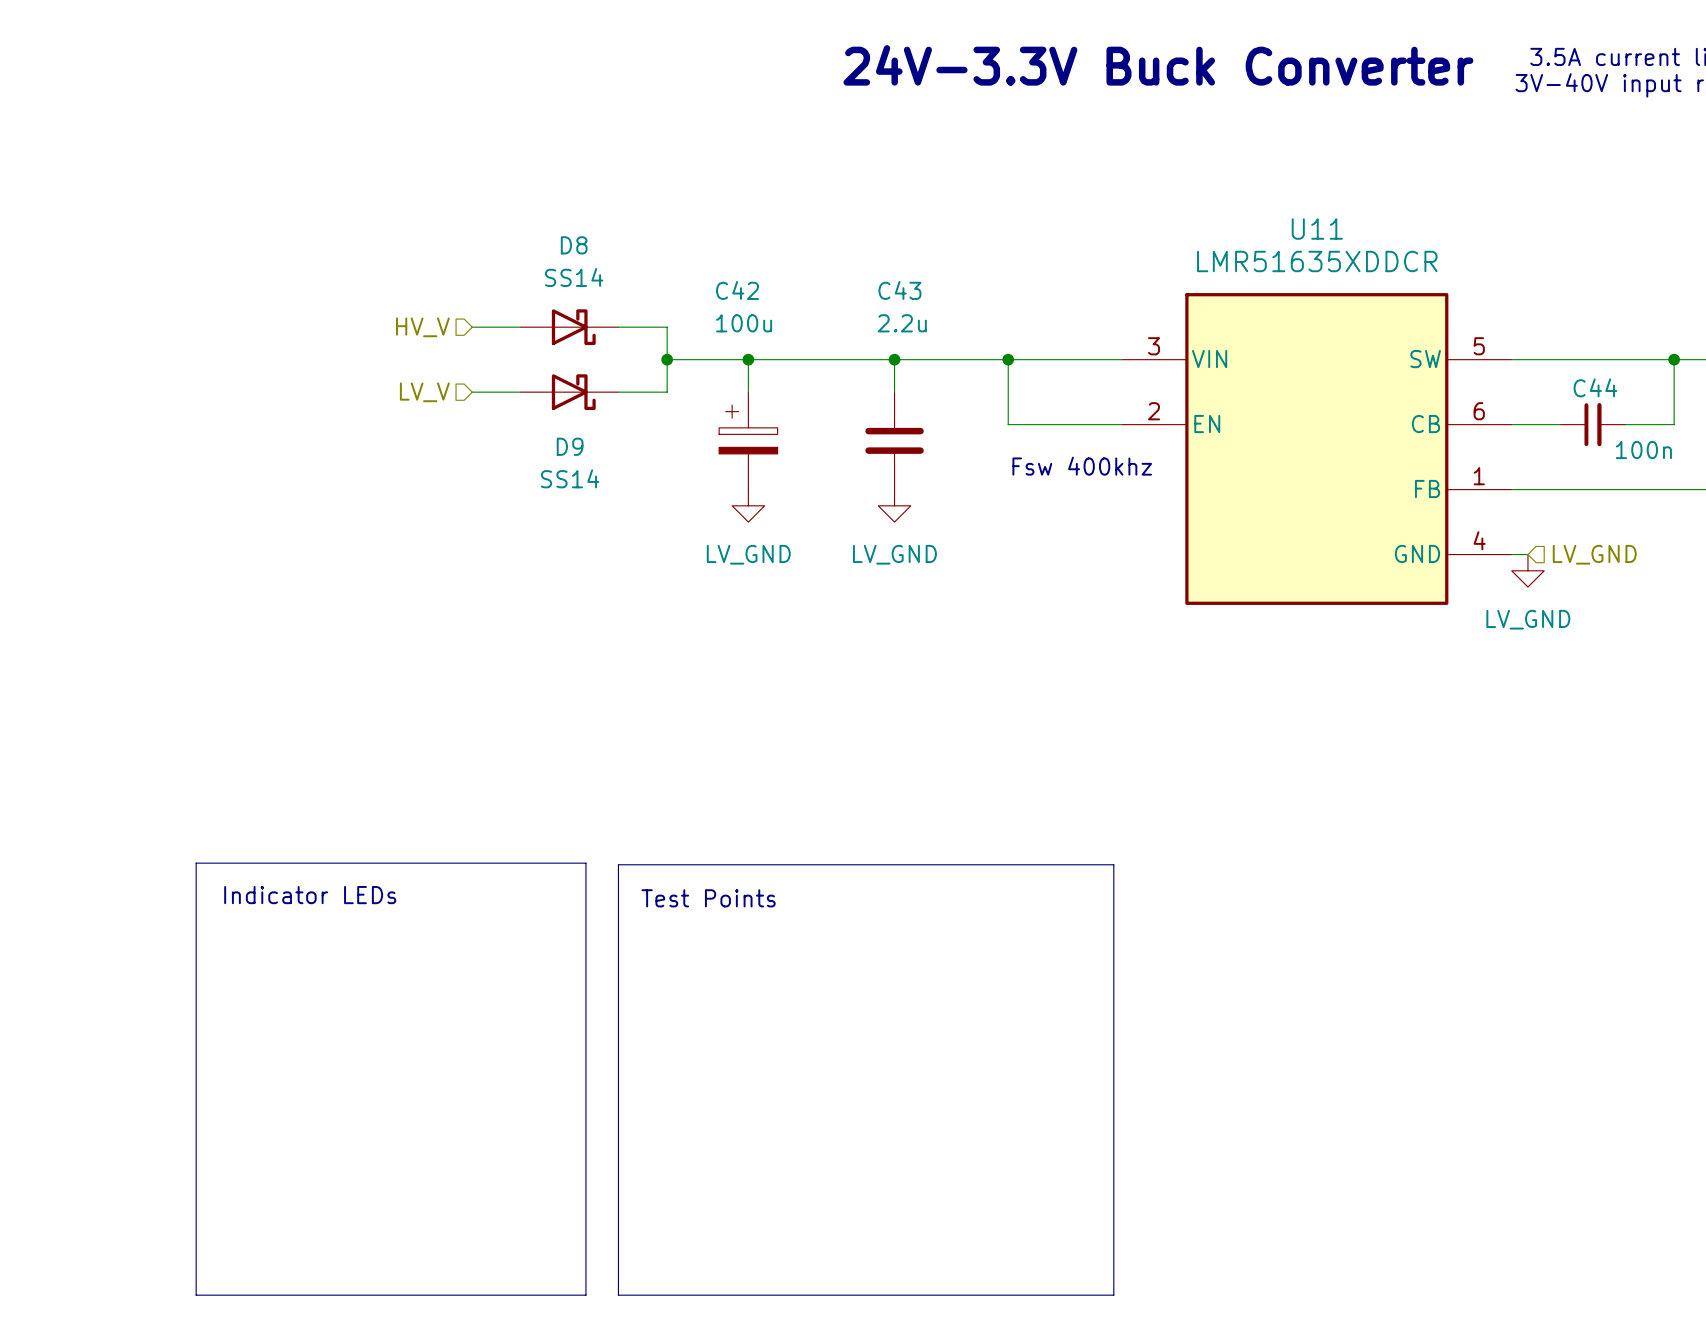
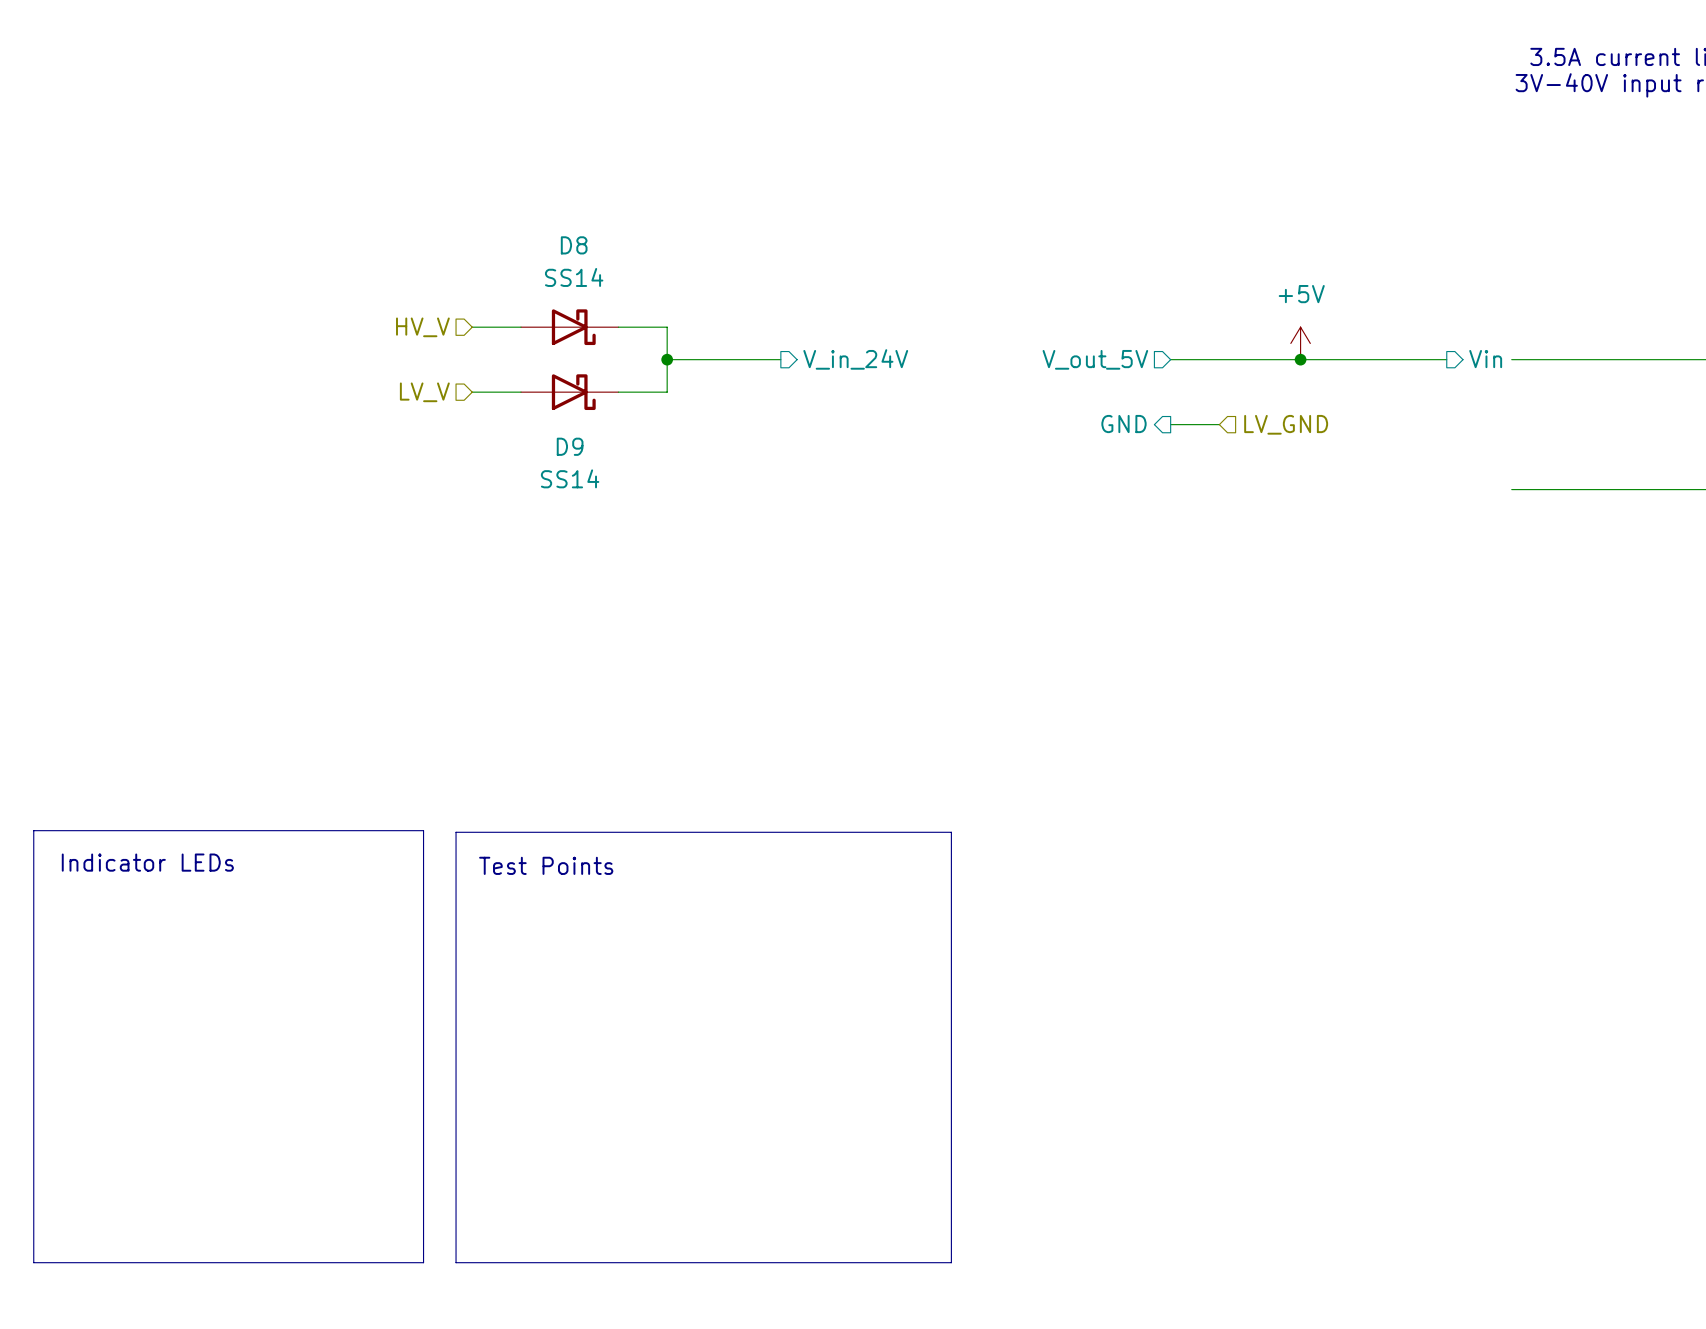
text: 24V-3.3V Buck Converter (1158, 65) -> none
power symbol: none -> +5V (1300, 343)
wire: (748, 359) (748, 392) -> none
junction: (748, 359) -> none
wire: (780, 359) (1121, 359) -> none
sheet pin: none -> V_in_24V (855, 359)
wire: (894, 359) (894, 392) -> none
junction: (894, 359) -> none
wire: (1008, 359) (1008, 424) (1121, 424) -> none
junction: (1008, 359) -> none
sheet pin: none -> V_out_5V (1095, 359)
junction: none -> (1300, 359)
sheet pin: none -> Vin (1485, 359)
wire: (1674, 359) (1674, 424) (1625, 424) -> none
junction: (1674, 359) -> none
sheet pin: none -> GND (1123, 424)
hierarchical label: none -> LV_GND (1286, 424)
wire: (1511, 424) (1560, 424) -> none
C44: 100n (1592, 424) -> none
C42: 100u (748, 440) -> none
C43: 2.2u (894, 440) -> none
U11: LMR51635XDDCR (1316, 448) -> none
text: Fsw 400khz (1082, 466) -> none
power symbol: LV_GND (748, 505) -> none
power symbol: LV_GND (894, 505) -> none
wire: (1511, 554) (1527, 554) -> none
hierarchical label: LV_GND (1594, 554) -> none
power symbol: LV_GND (1527, 570) -> none
line: (196, 863) (585, 863) (585, 1295) (196, 1295) (196, 863) -> (33, 830) (423, 830) (423, 1262) (33, 1262) (33, 830)
line: (618, 864) (1113, 864) (1113, 1295) (618, 1295) (618, 864) -> (456, 832) (951, 832) (951, 1262) (456, 1262) (456, 832)
text position: Indicator LEDs (310, 895) -> Indicator LEDs (147, 862)
text position: Test Points (708, 898) -> Test Points (546, 865)

